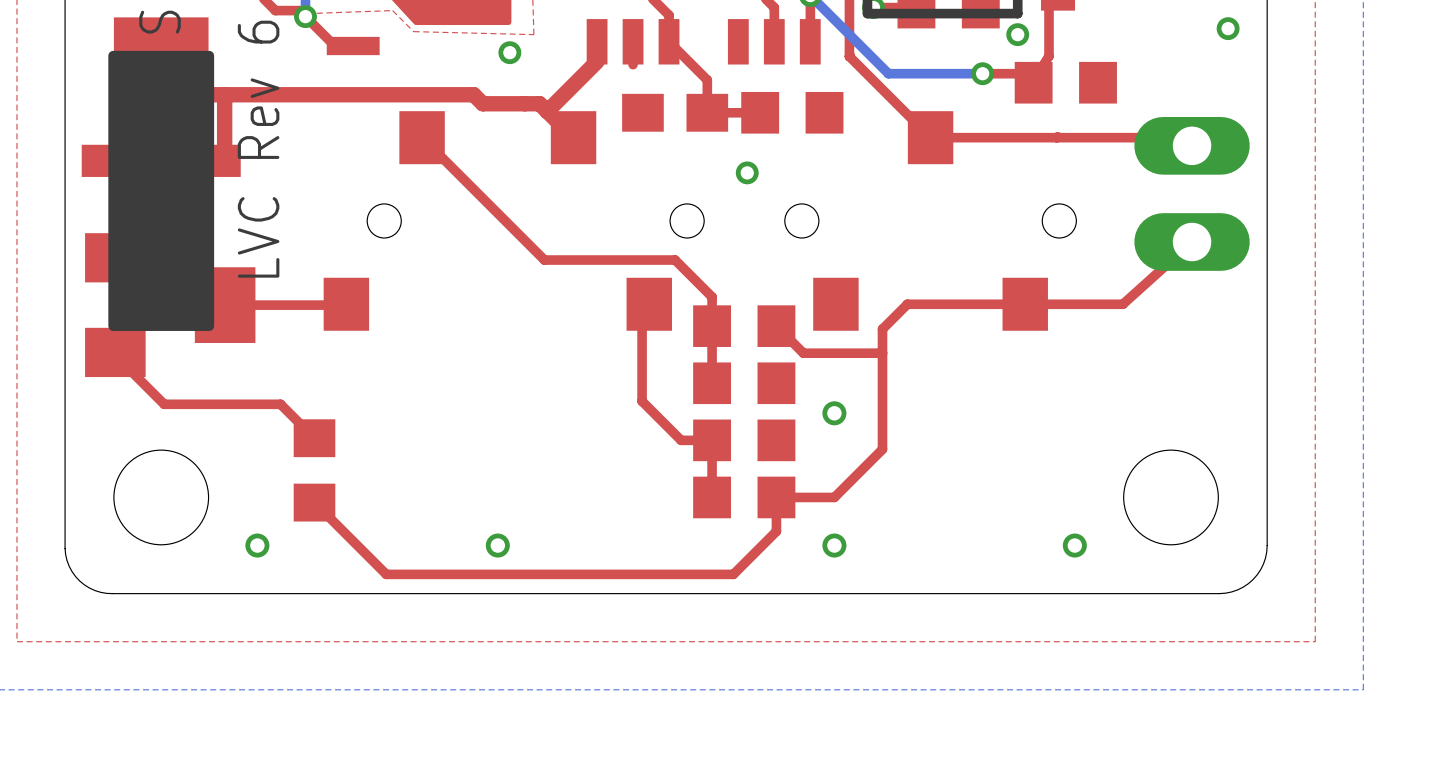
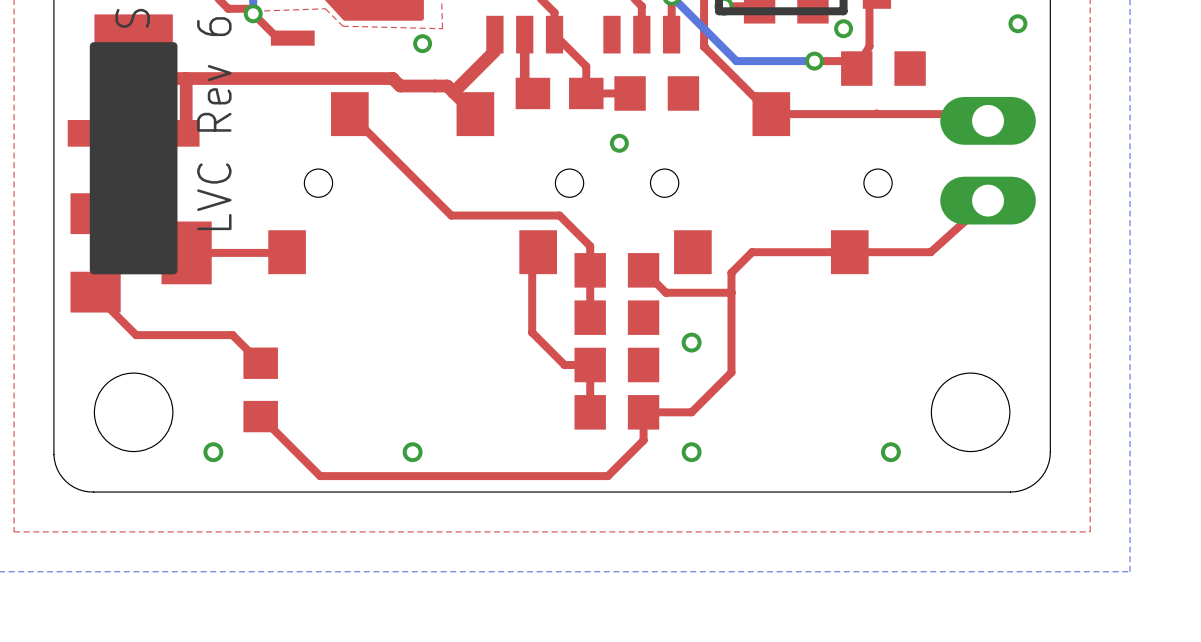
top track: none -> (524, 53) (524, 85)

